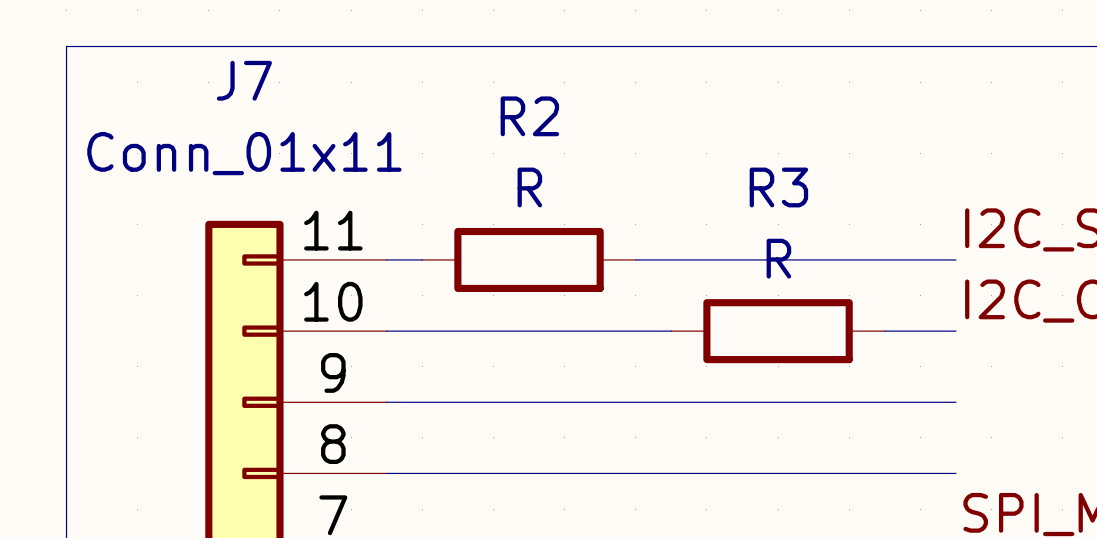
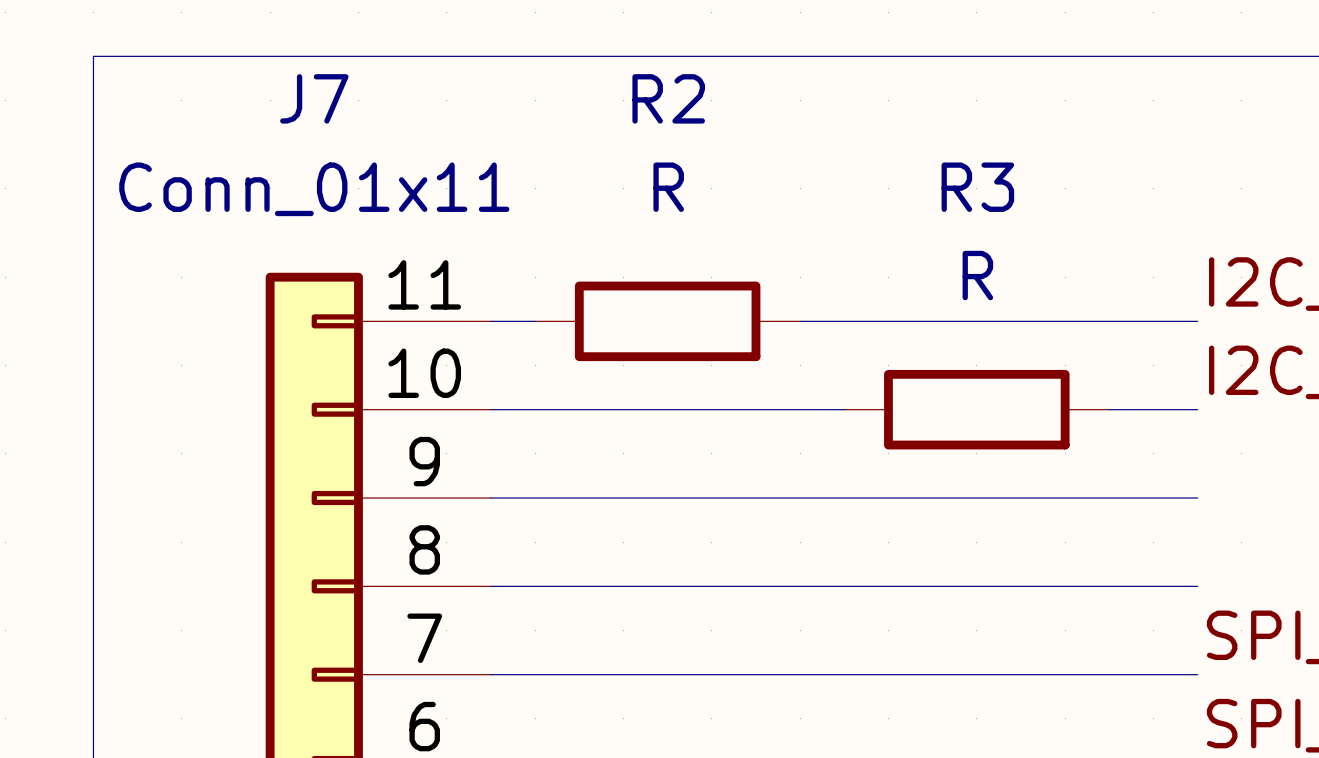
R2 name position: R2 (529, 116) -> R2 (668, 98)
R2 value position: R (529, 187) -> R (668, 187)
R3 name position: R3 (778, 187) -> R3 (977, 187)
R3 value position: R (778, 258) -> R (977, 275)

